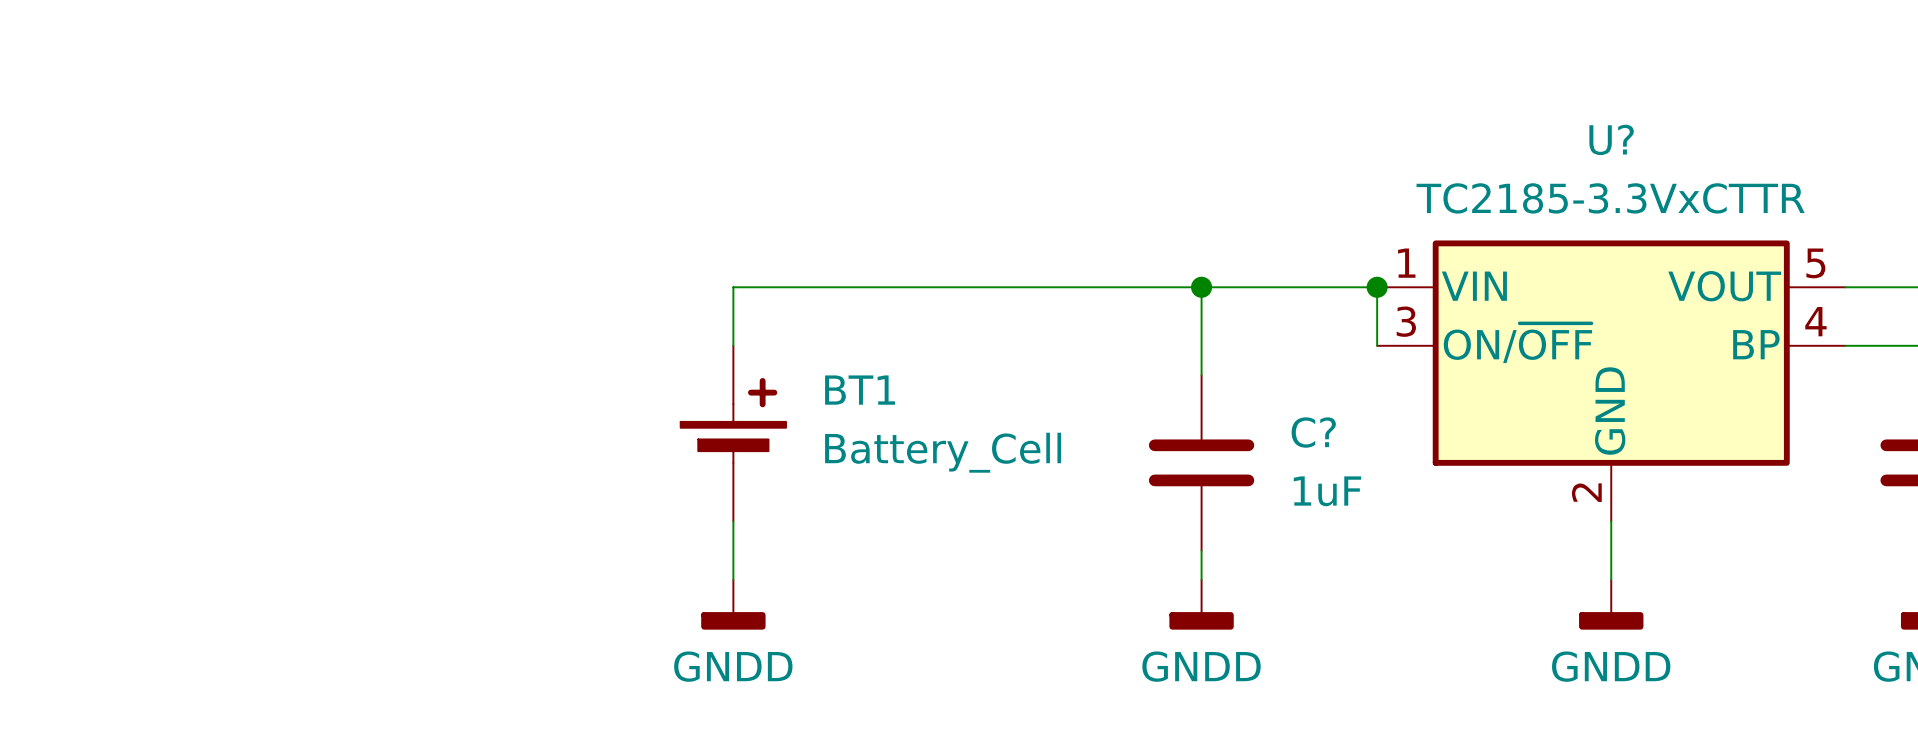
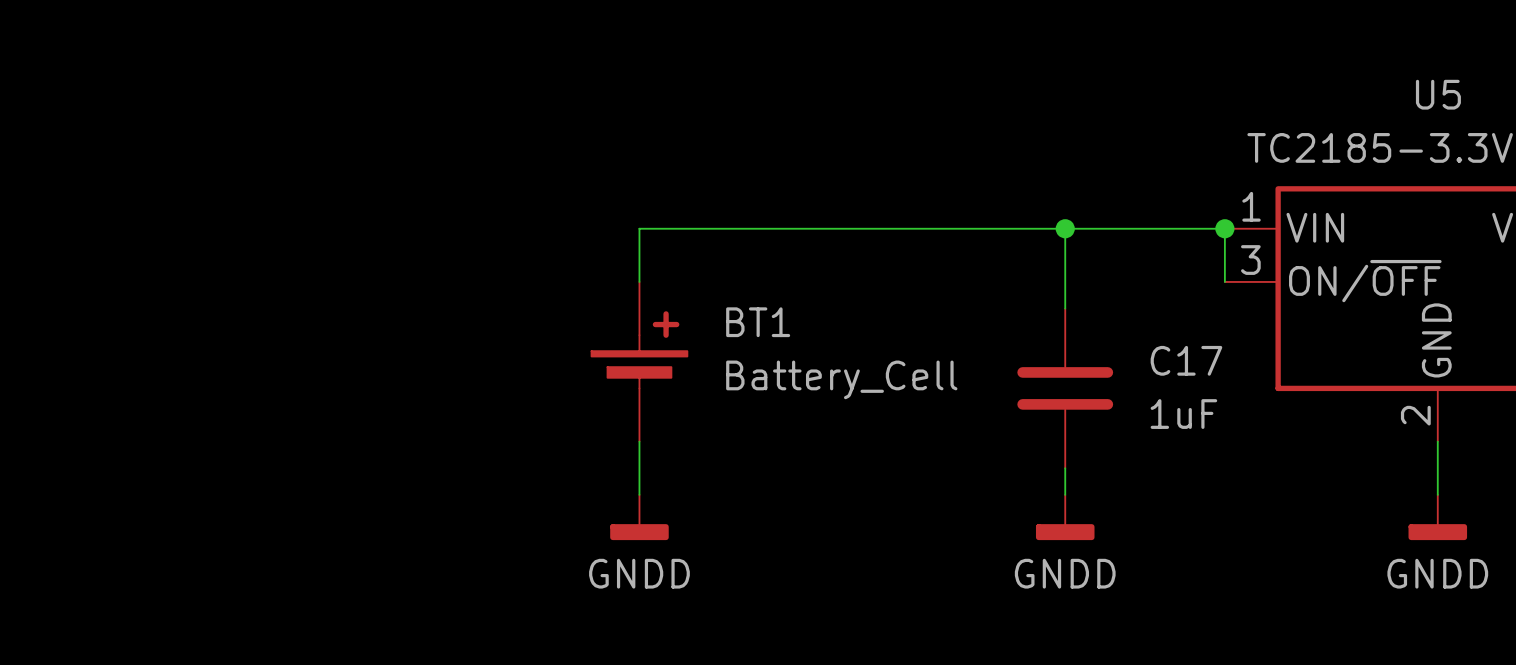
U? name: U? (1611, 139) -> U5 (1438, 94)
C? name: C? (1313, 432) -> C17 (1186, 360)

